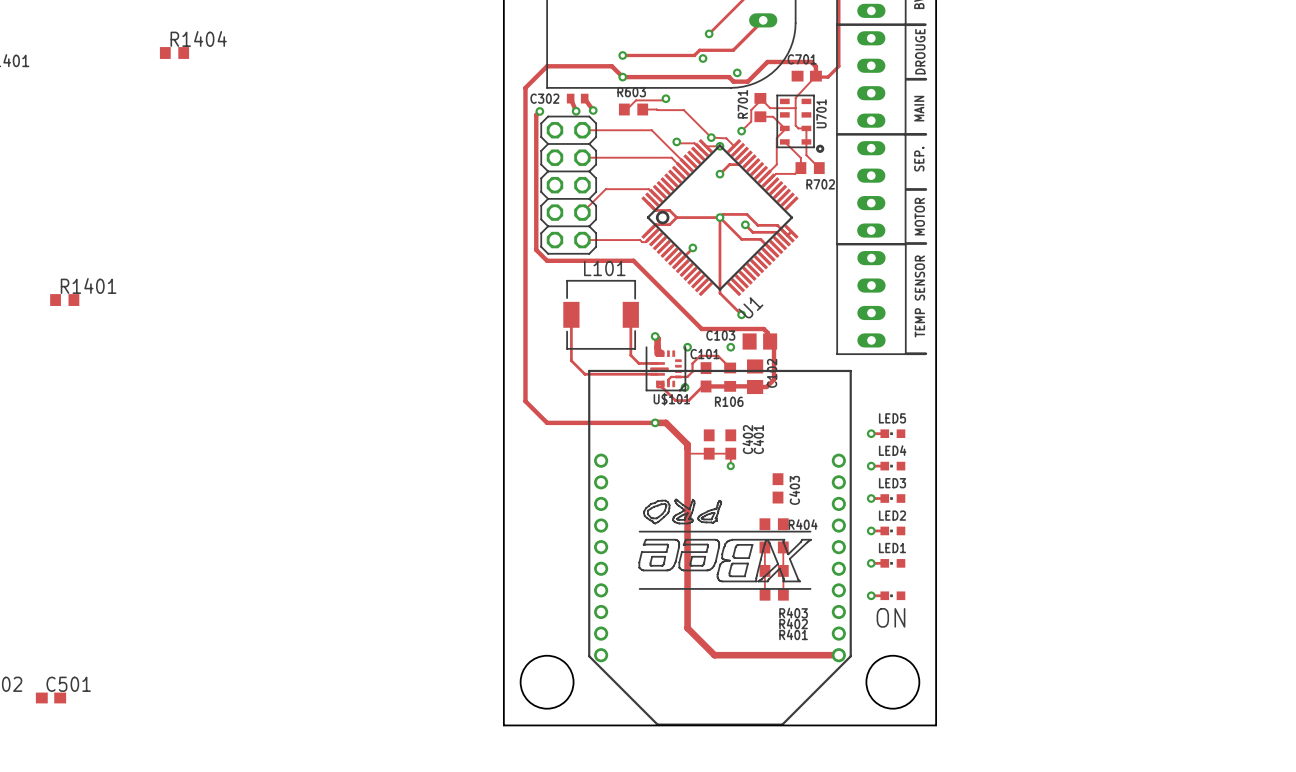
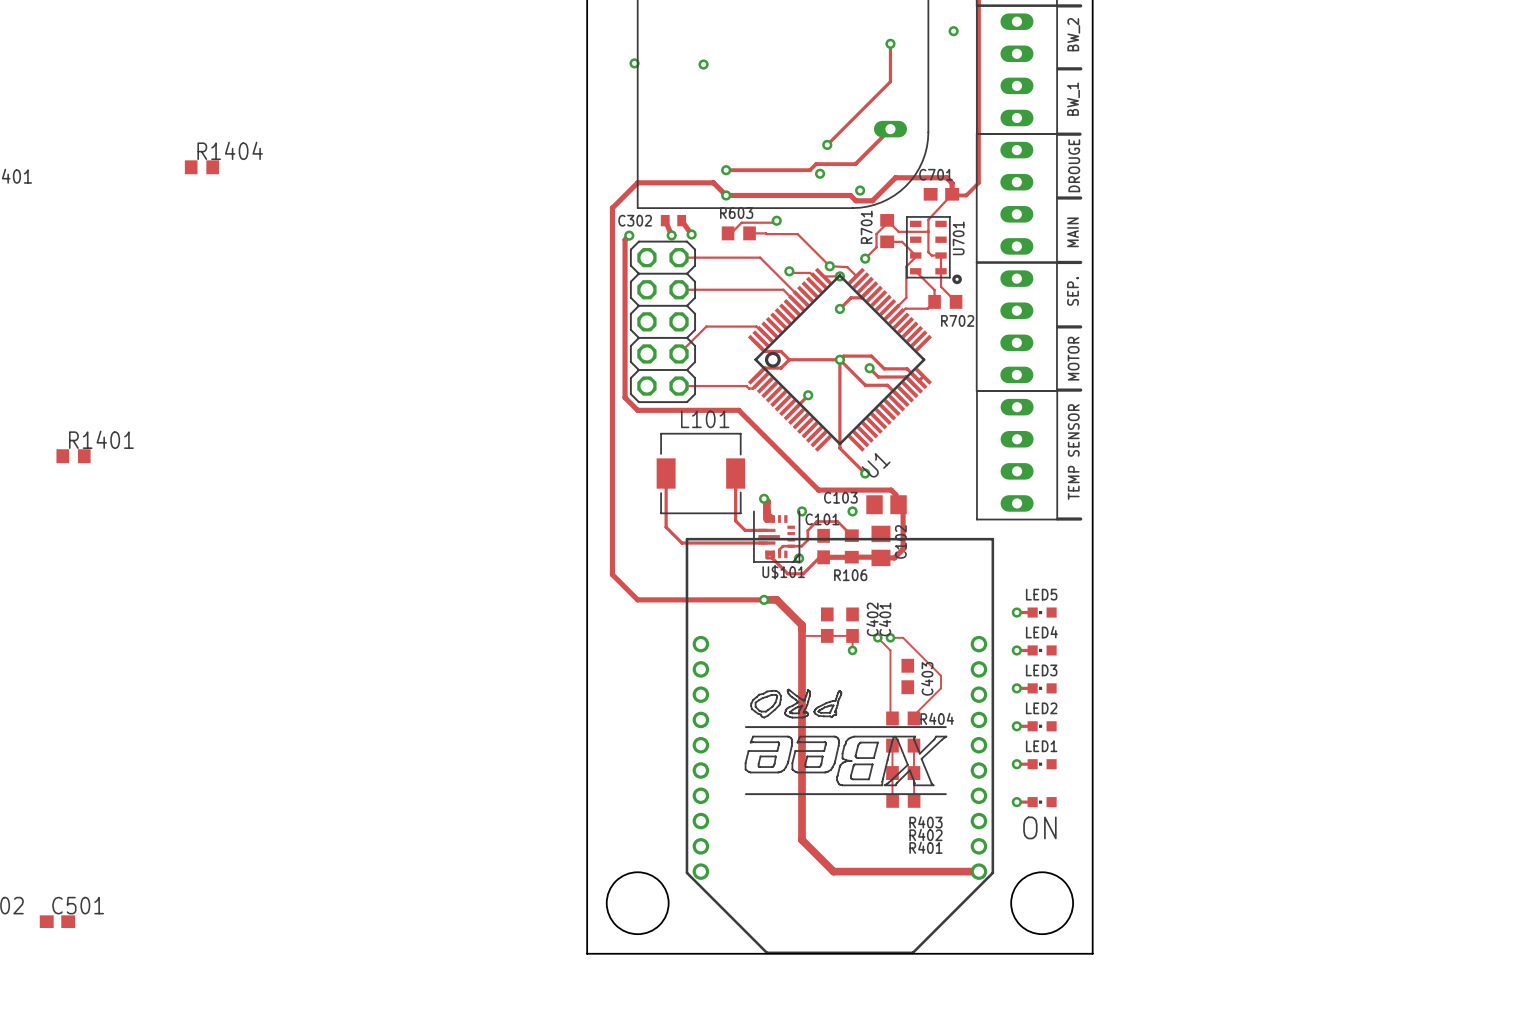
track: none -> (877, 637) (890, 650) (890, 713) (892, 718)
via: none -> (877, 637)
track: none -> (890, 637) (903, 637) (941, 675) (941, 688) (915, 713) (913, 718)
via: none -> (890, 637)

